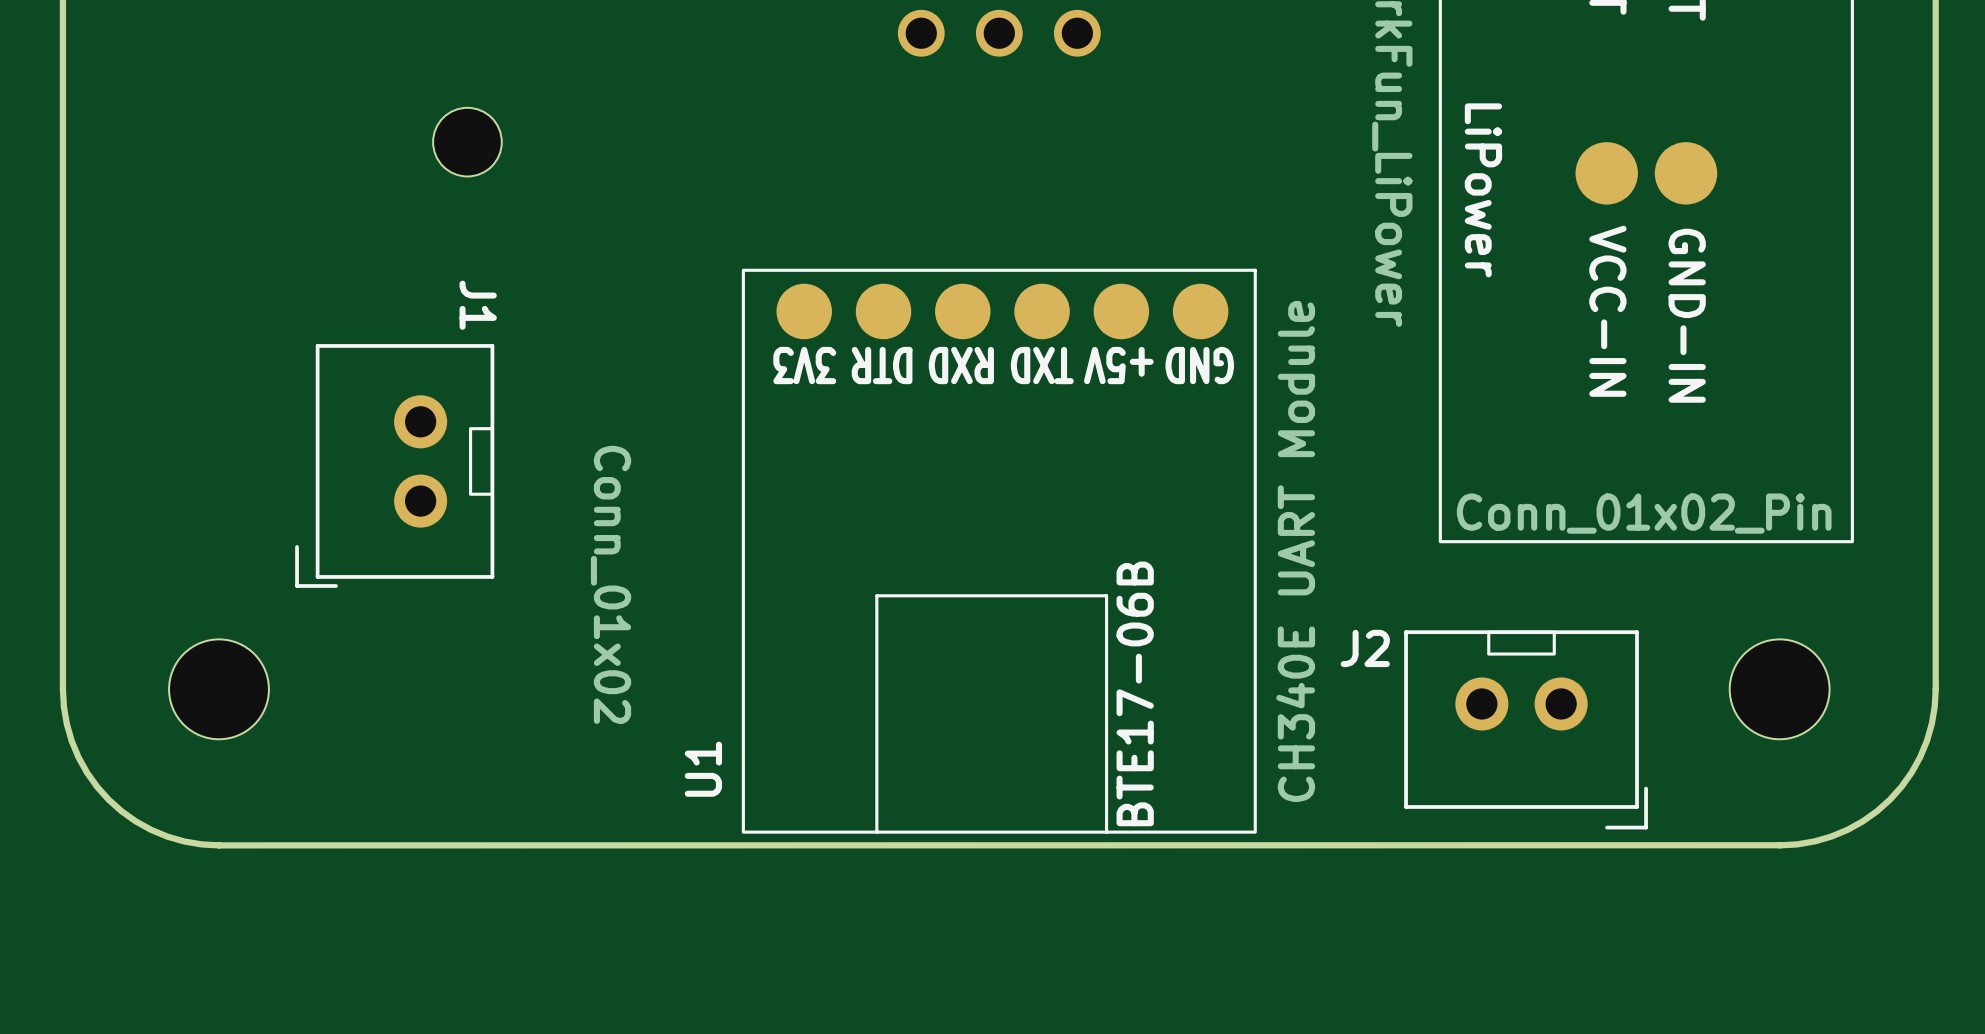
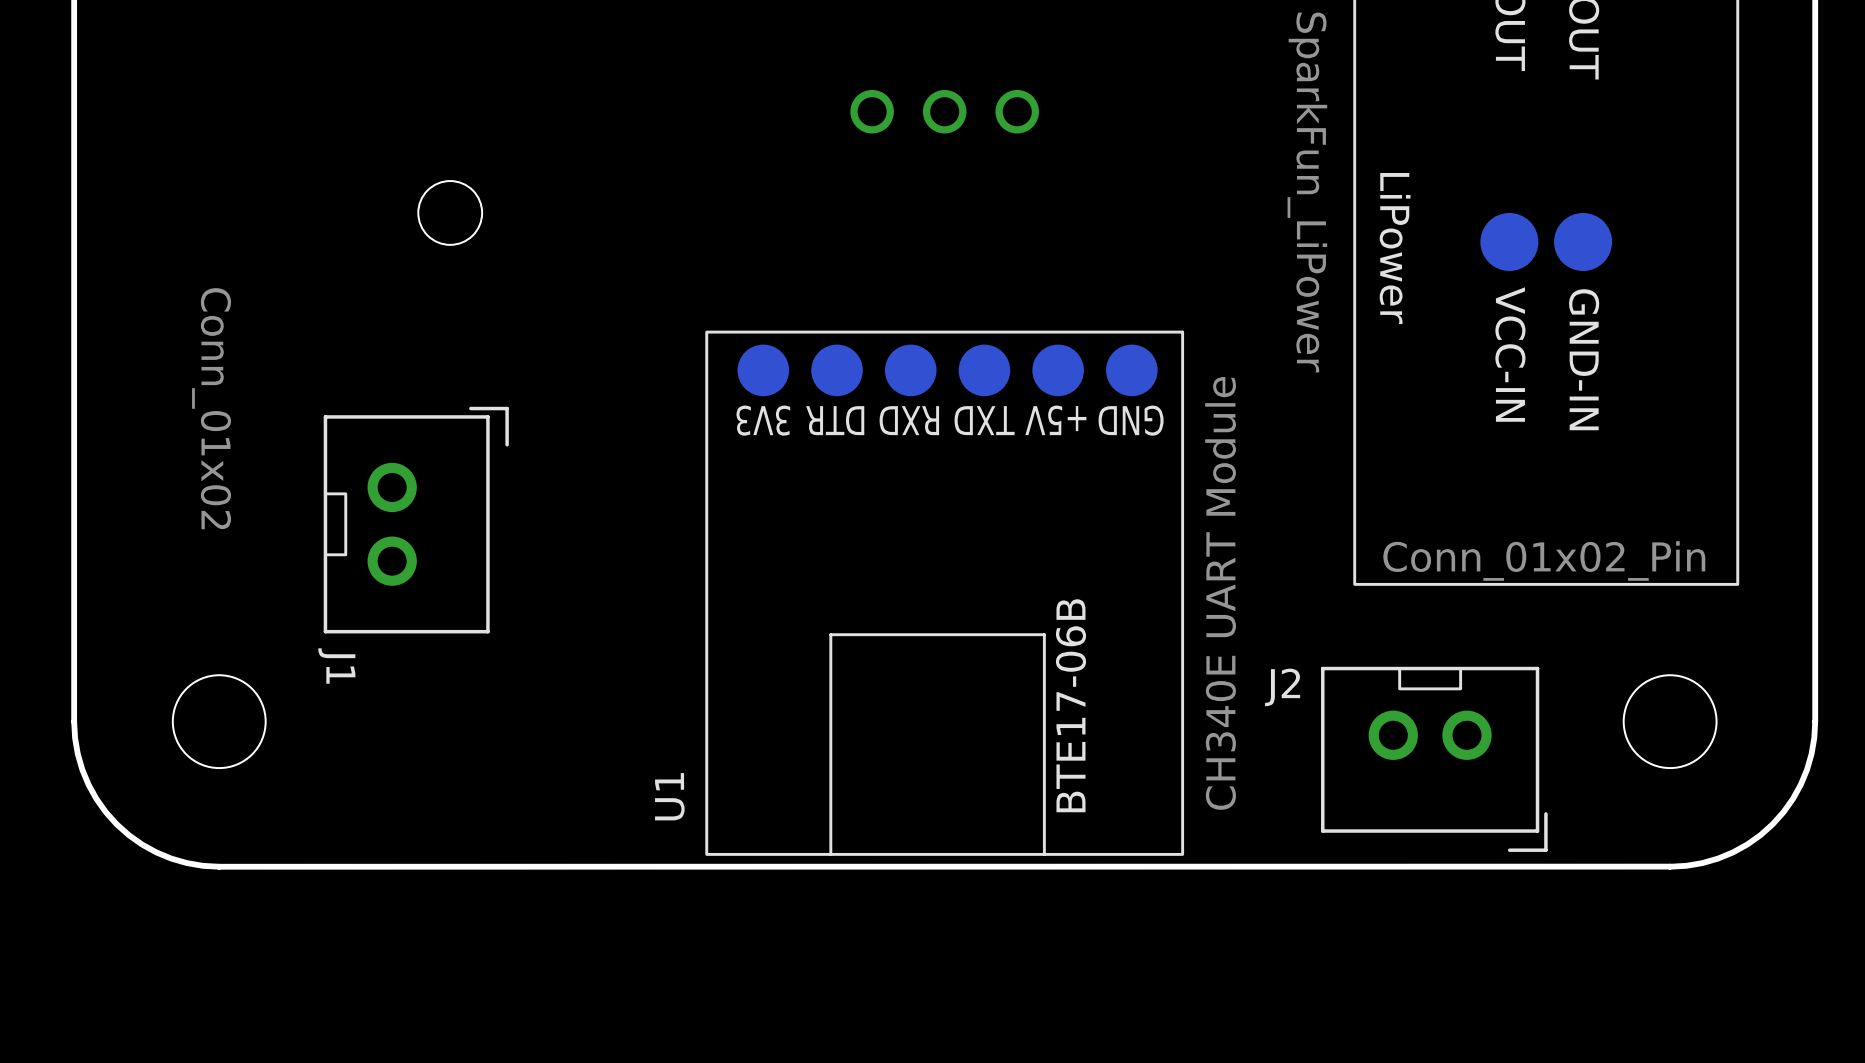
J1 rotation: 0° (394, 465) -> 180° (416, 520)

